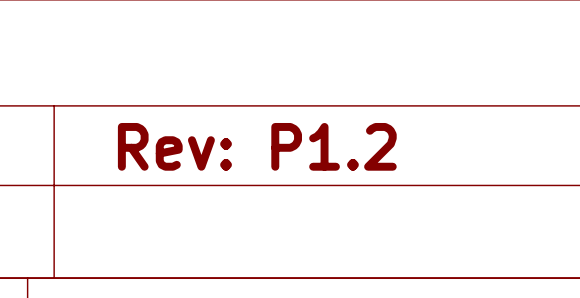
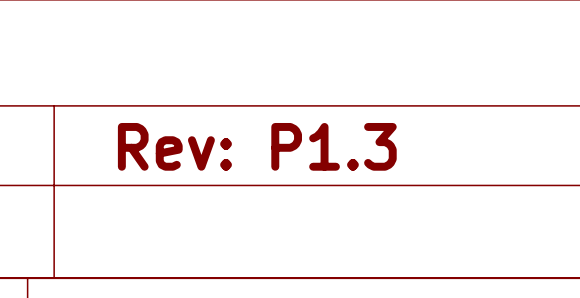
title block: Rev: P1.2 (257, 146) -> Rev: P1.3 (257, 146)

